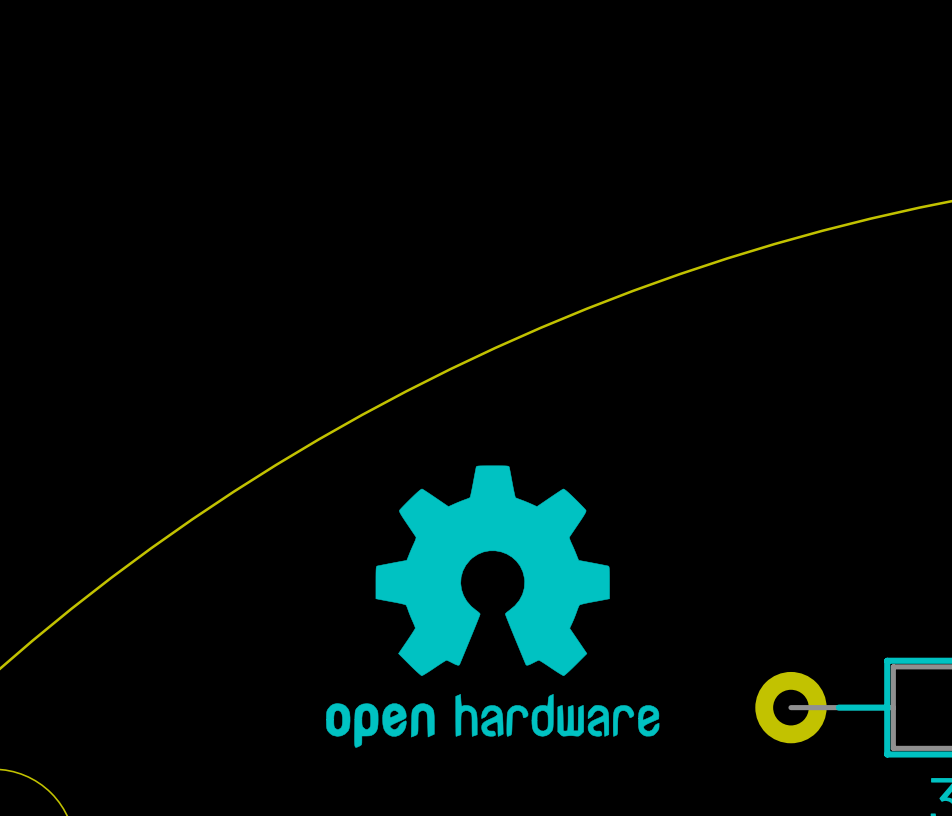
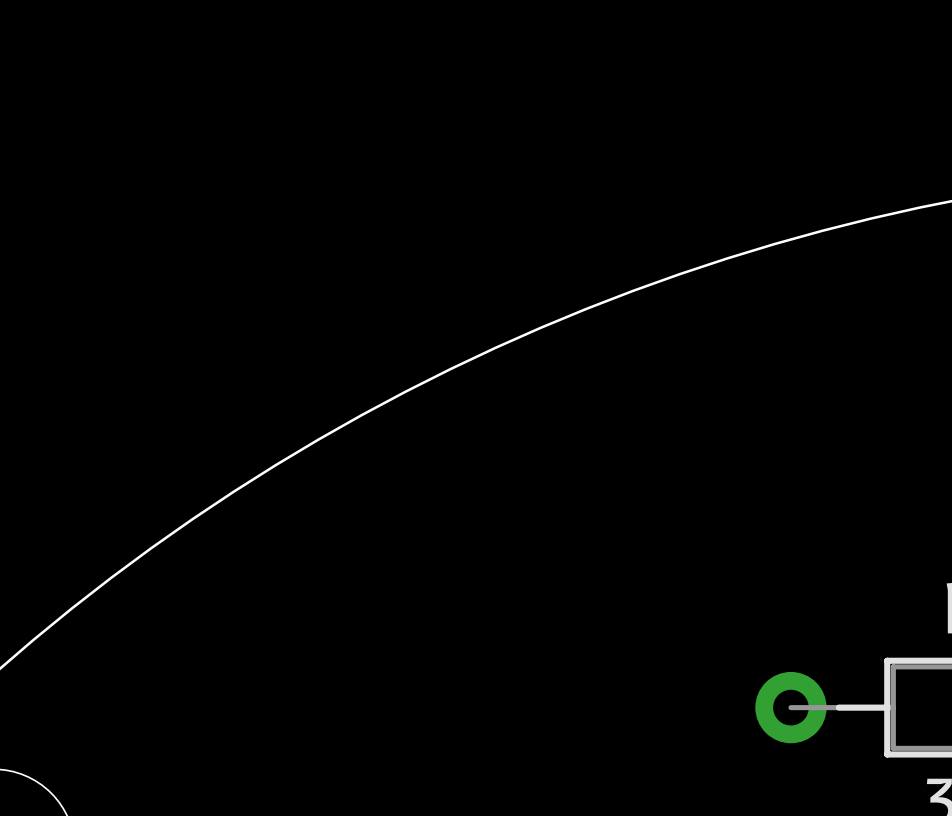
drawing: [326, 465, 660, 748] -> none

